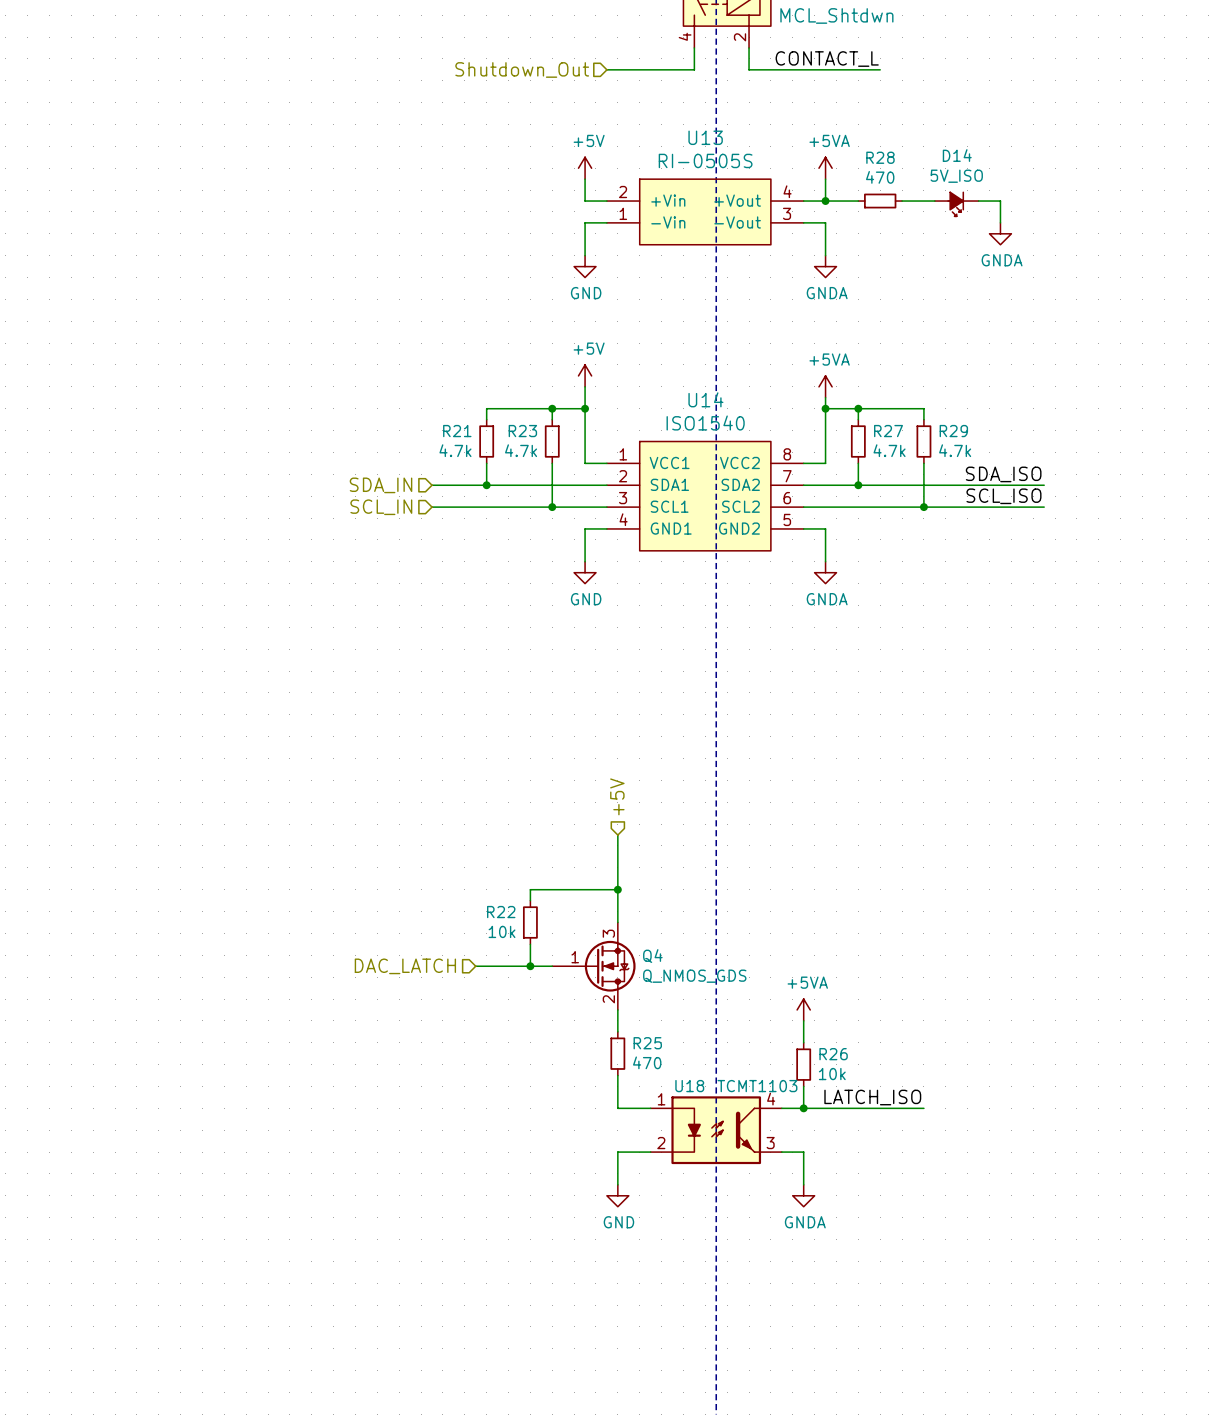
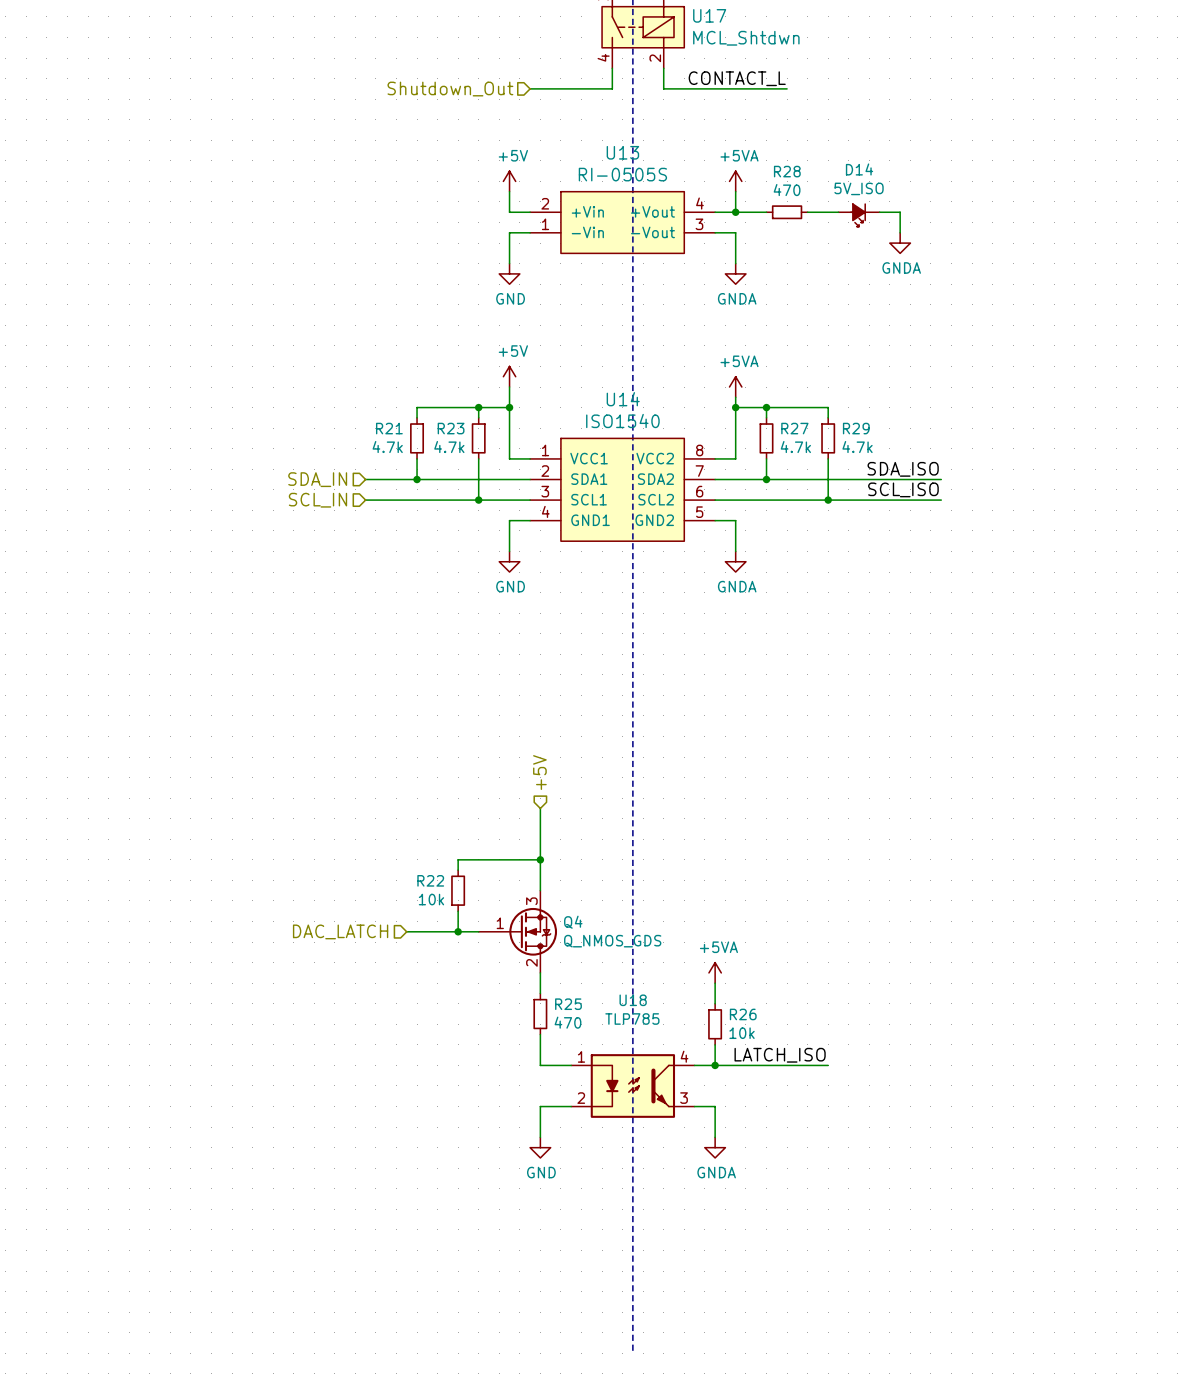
U18 name position: U18 (689, 1086) -> U18 (633, 1000)
U18 value: TCMT1103 (757, 1086) -> TLP785 (632, 1019)

